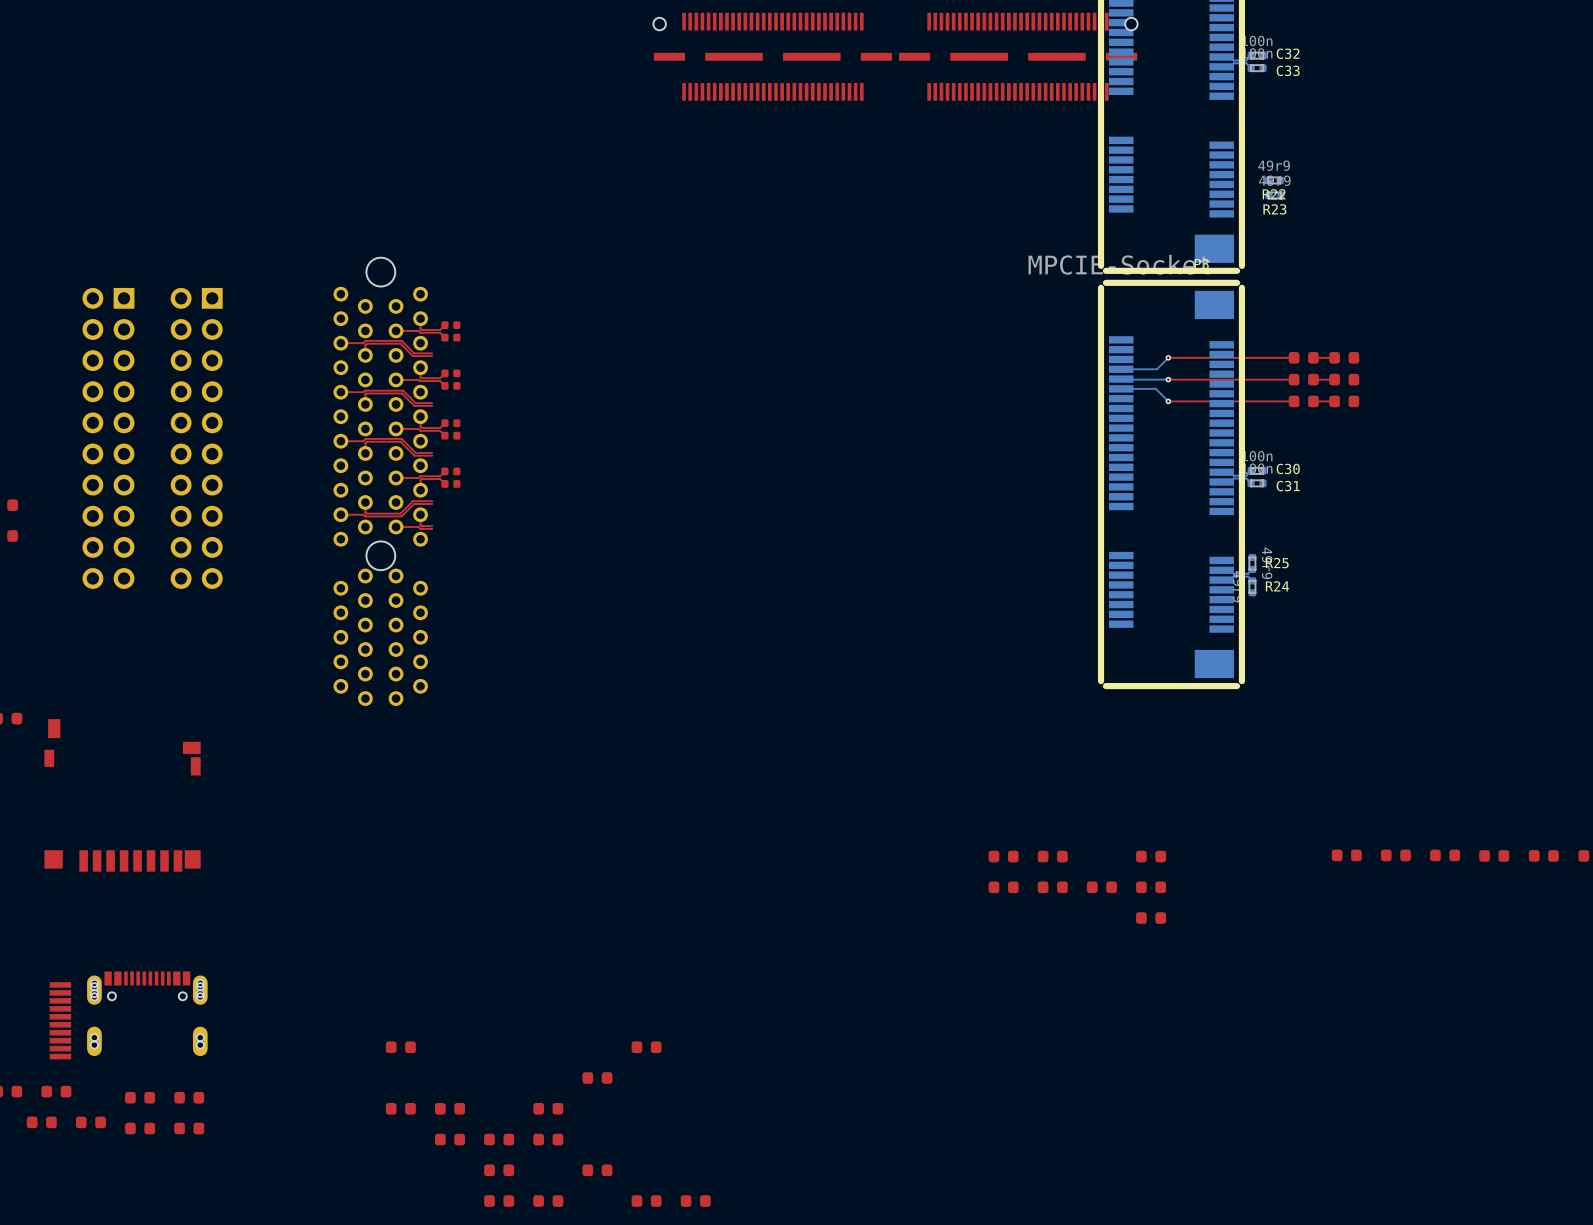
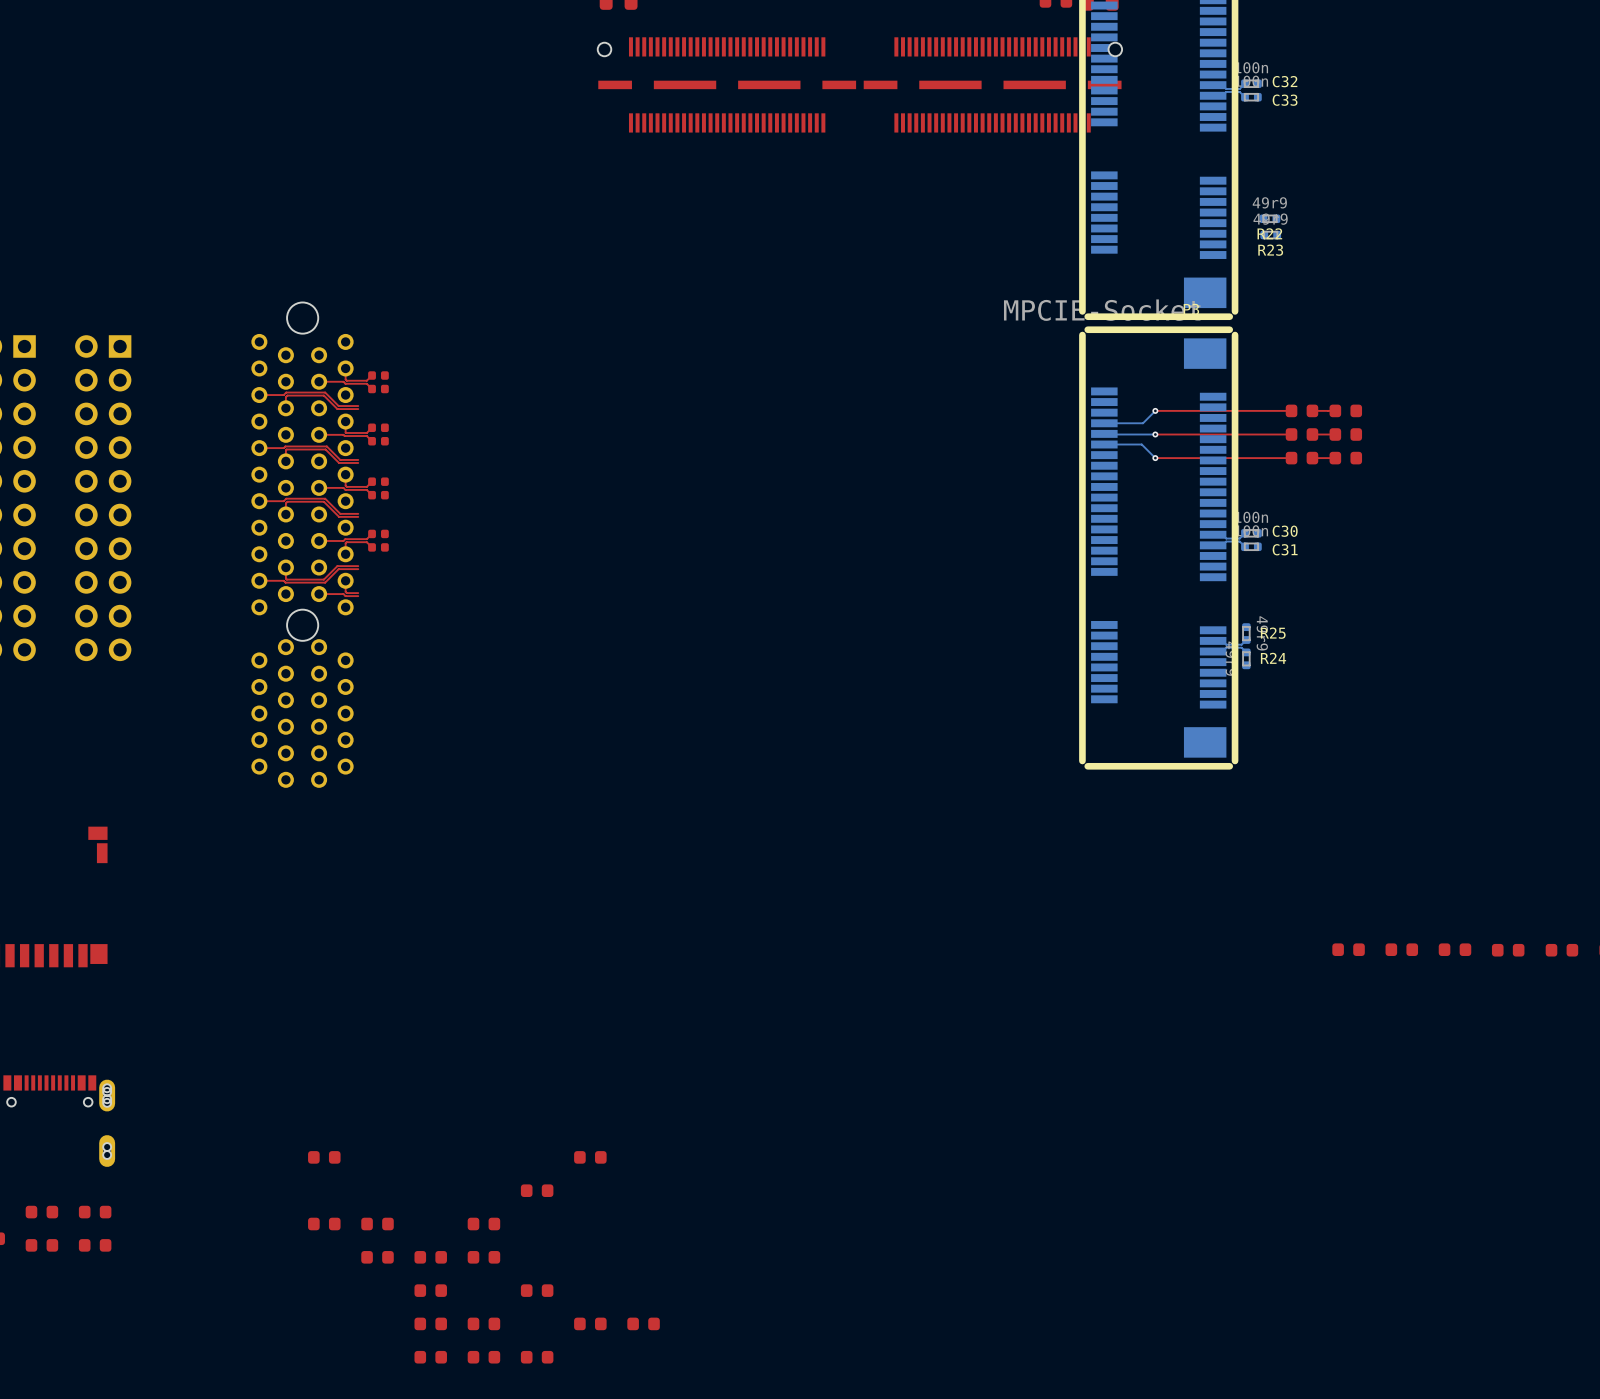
part: (1003, 856) -> none
part: (1052, 856) -> none
part: (1151, 856) -> none
part: (1003, 887) -> none
part: (1052, 887) -> none
part: (1101, 887) -> none
part: (1151, 887) -> none
part: (1151, 918) -> none

